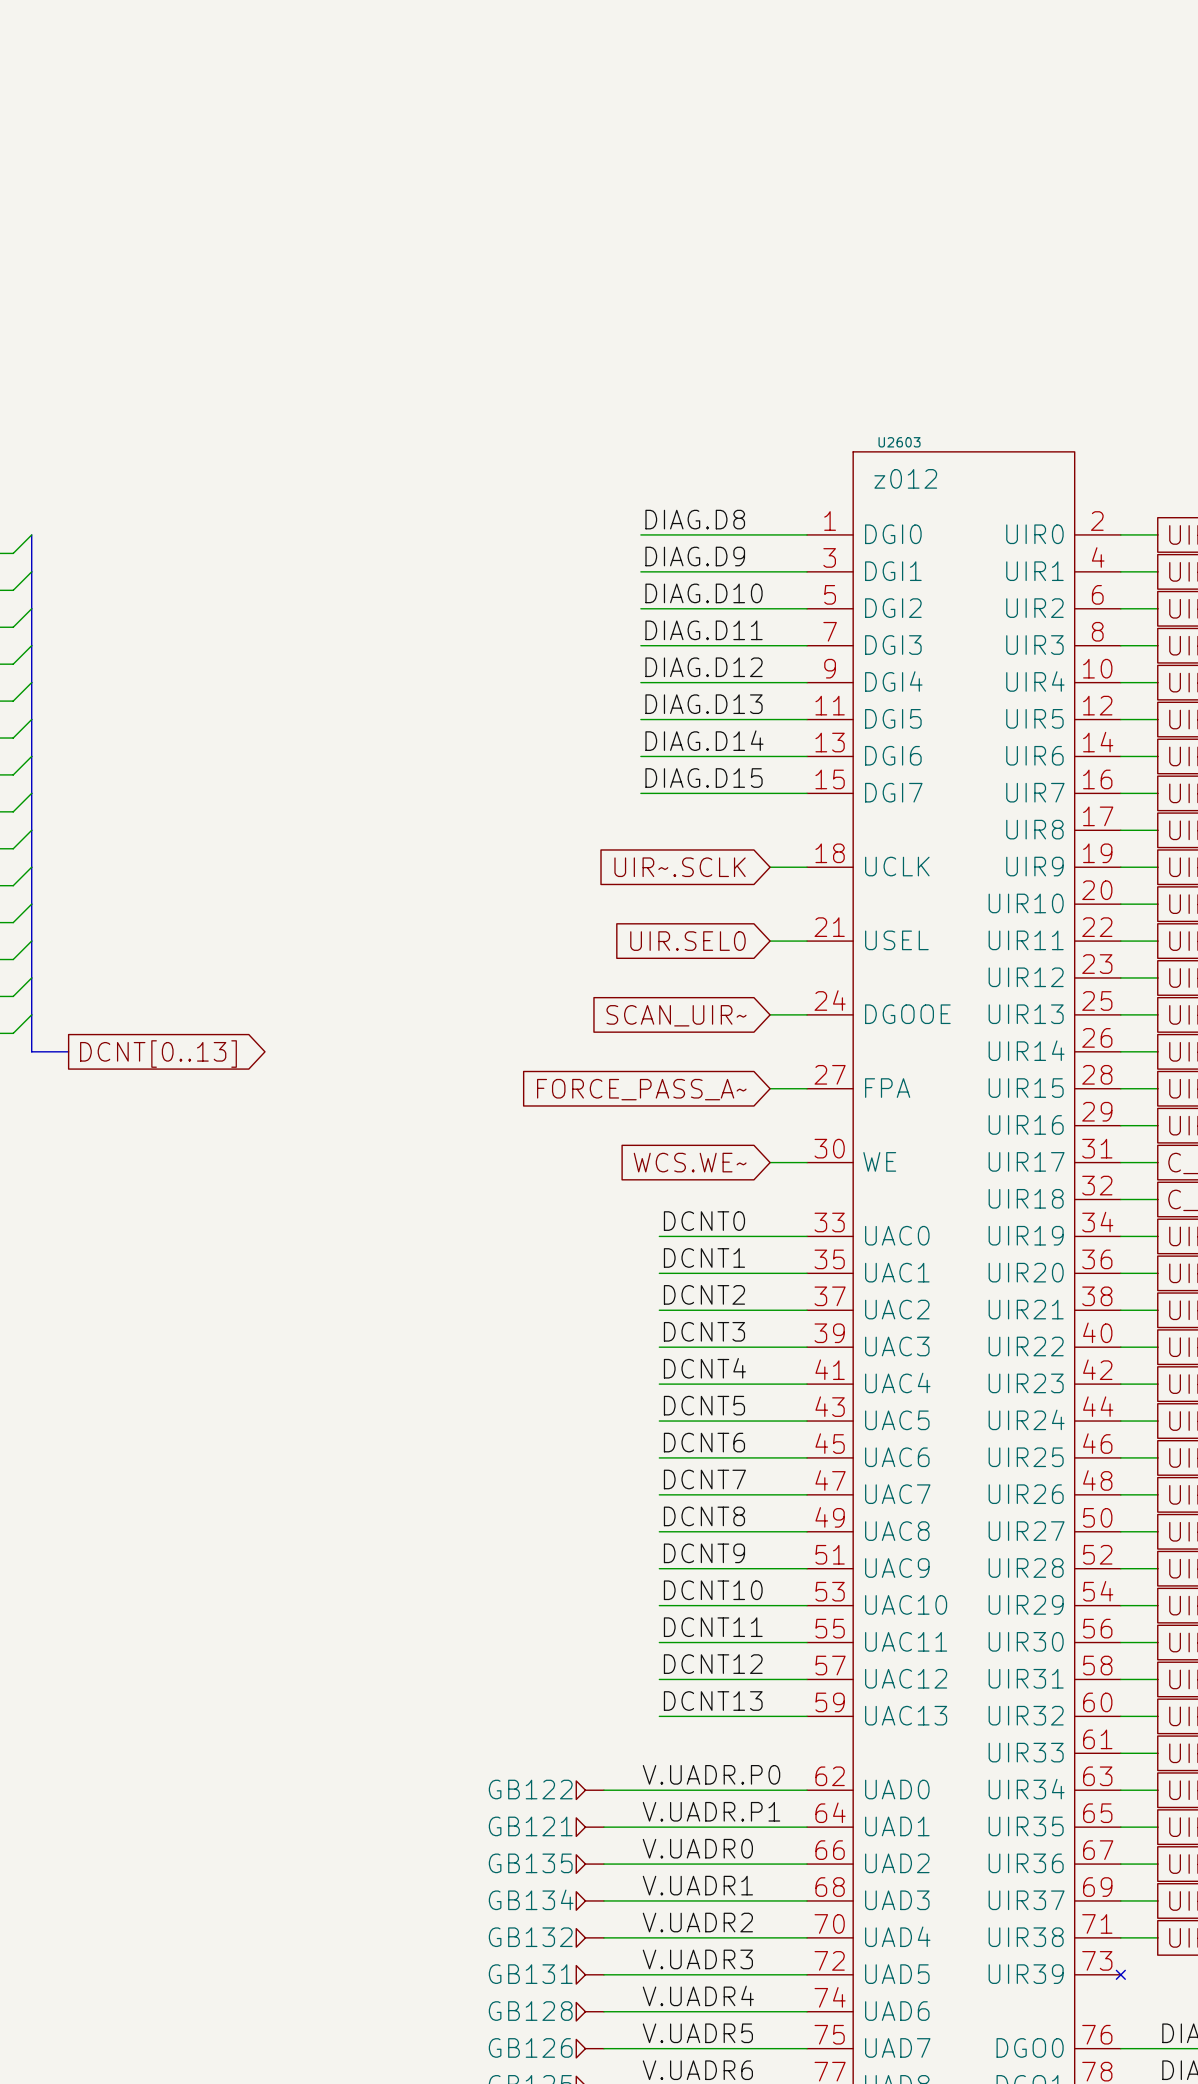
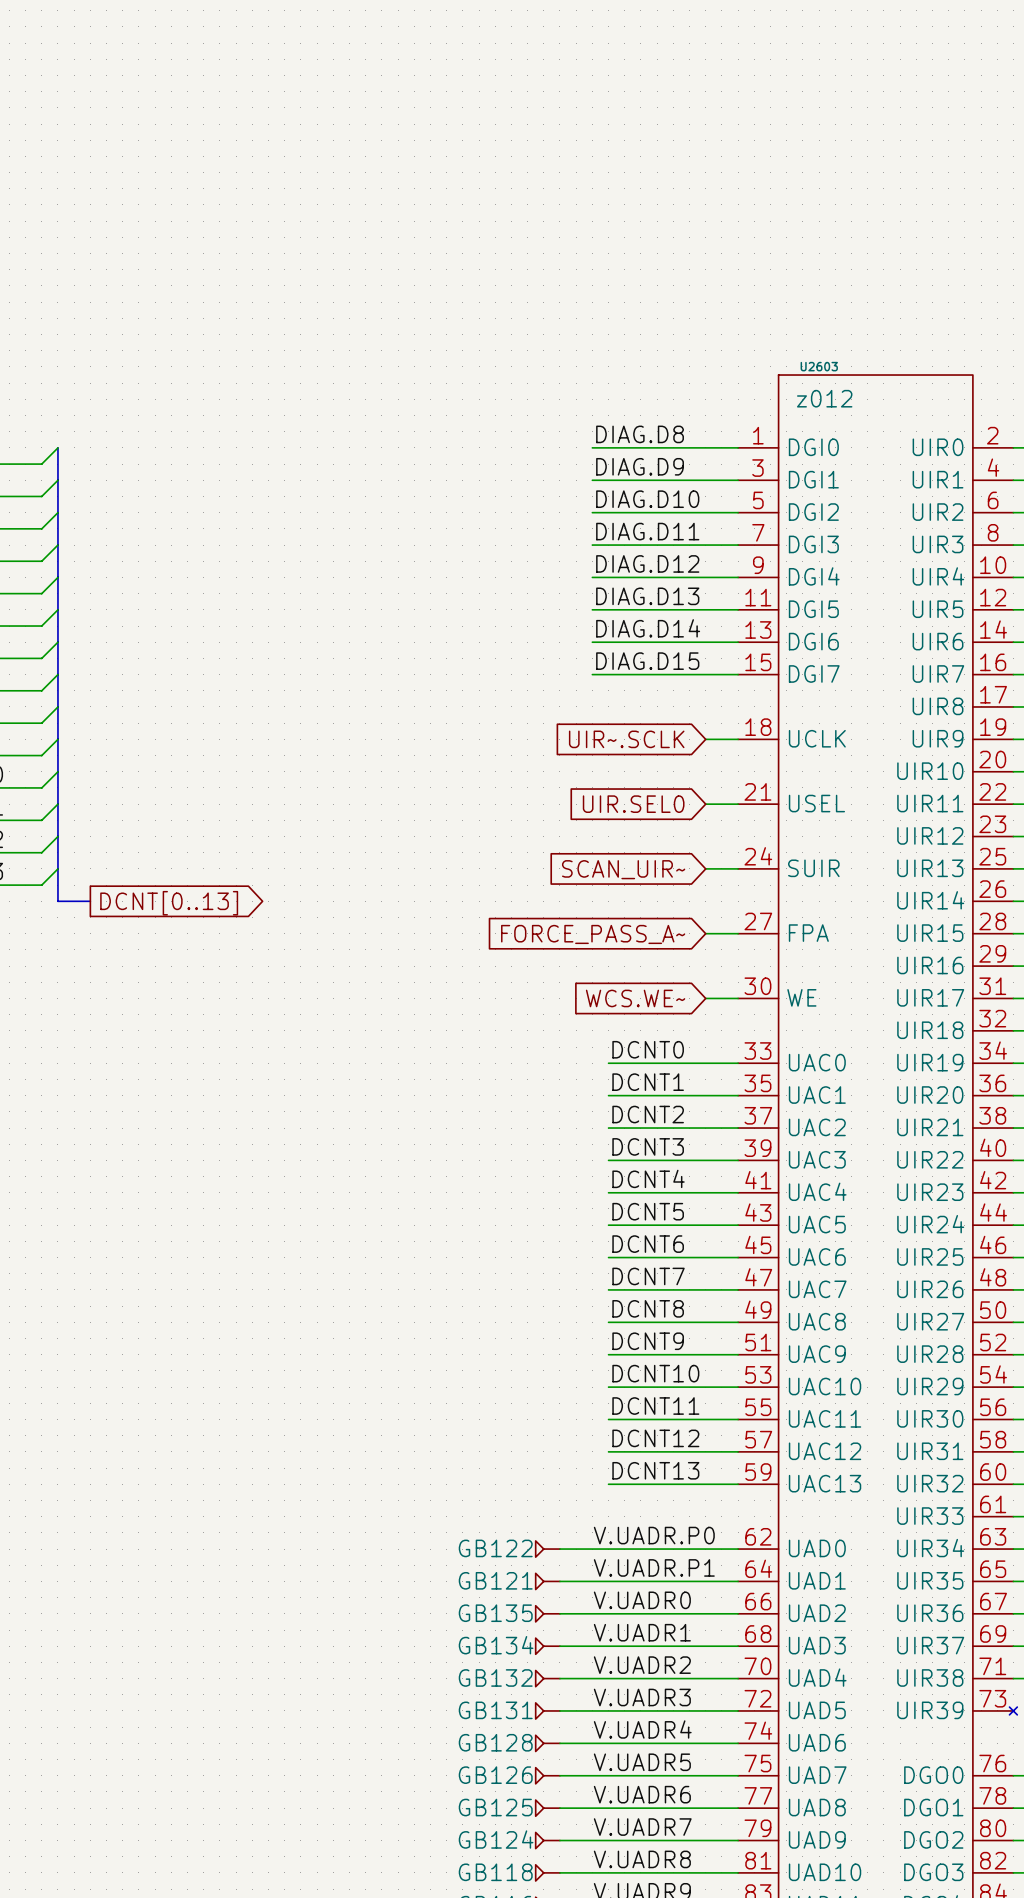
U2603 pin name: DGOOE (907, 1014) -> SUIR (813, 868)

